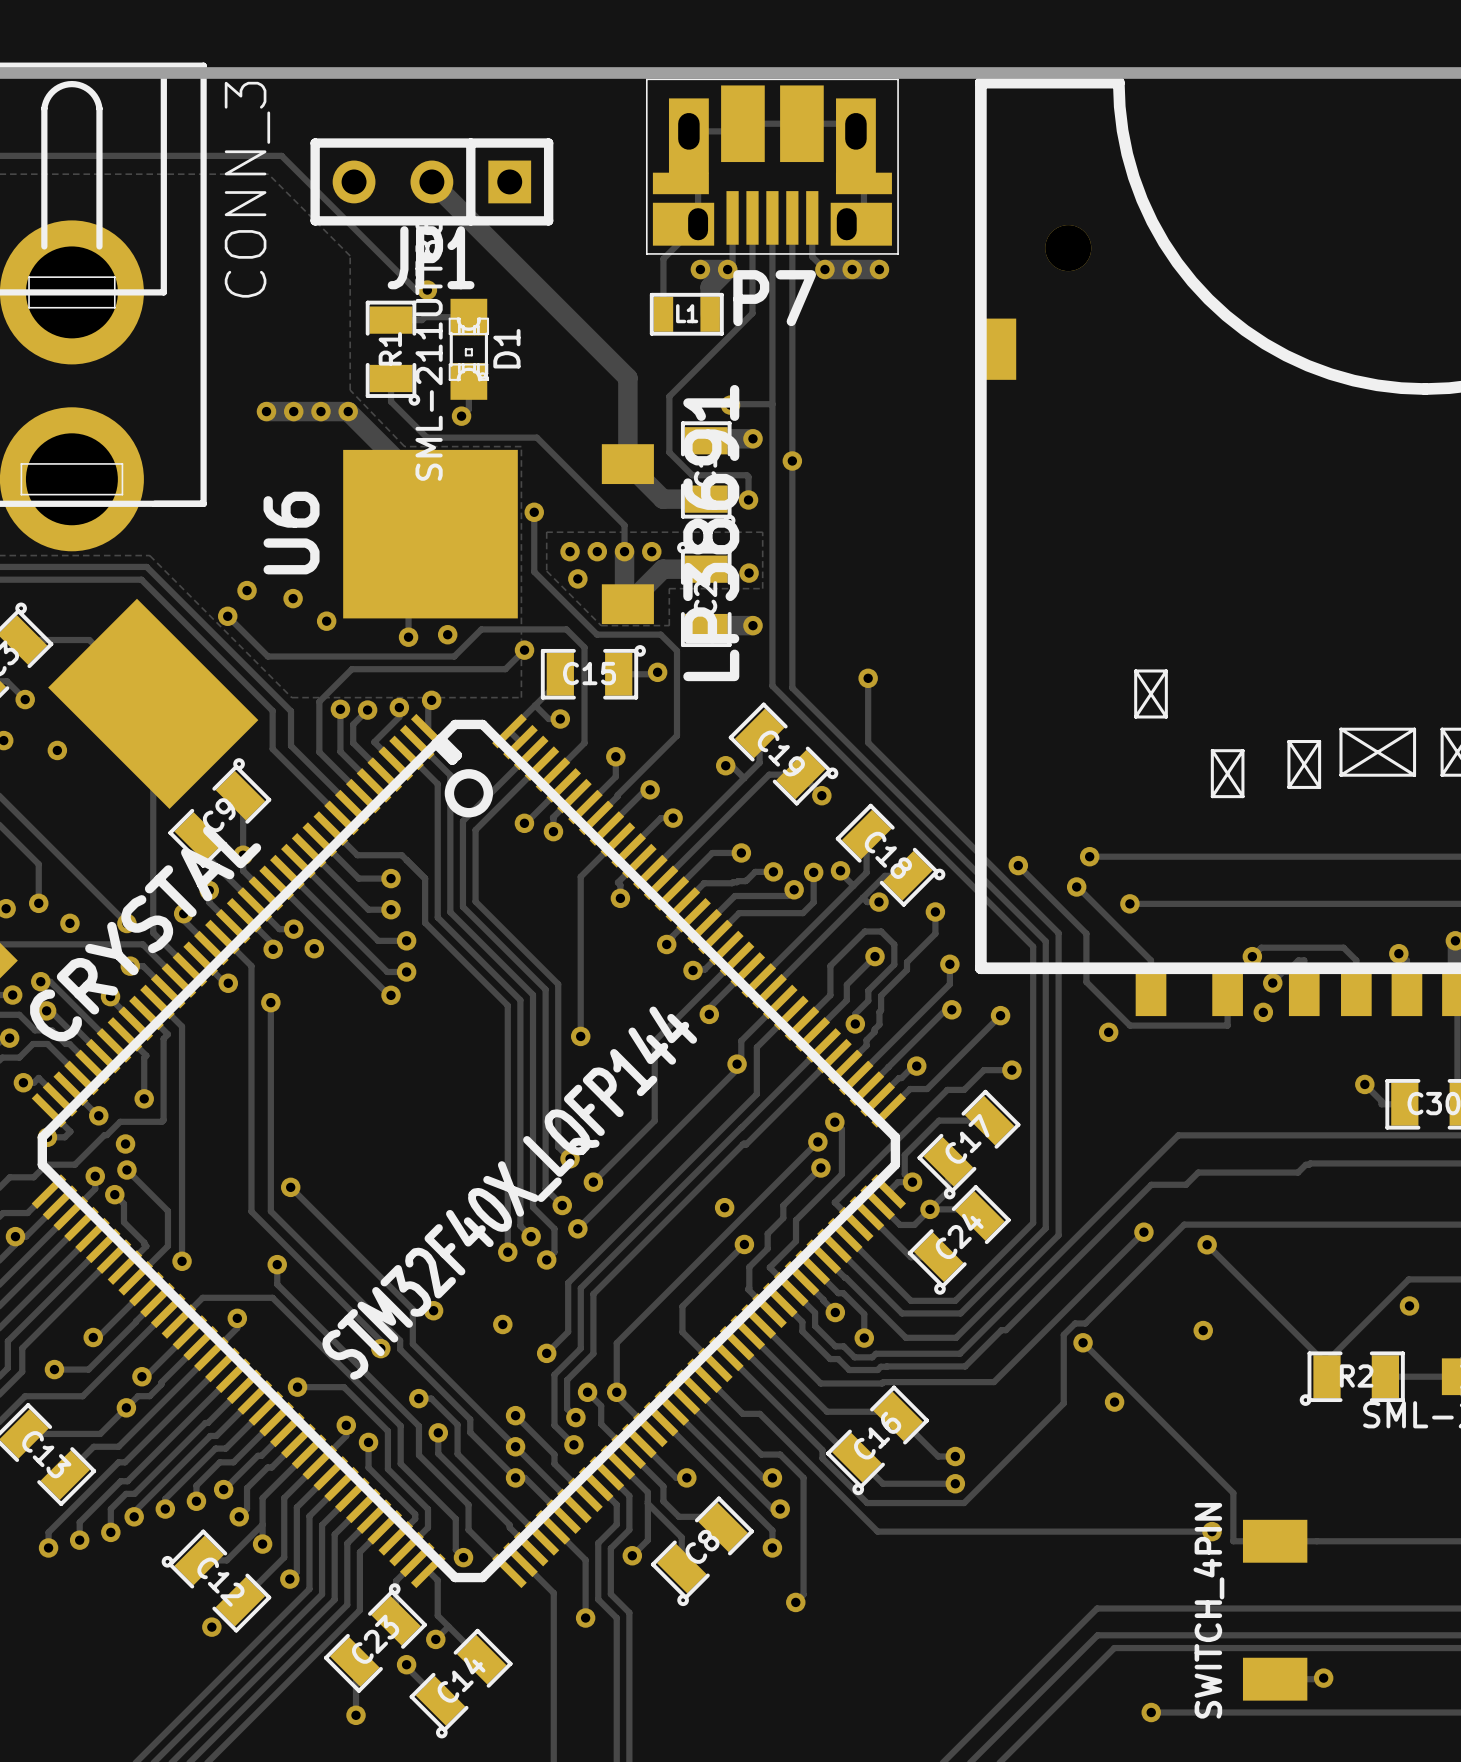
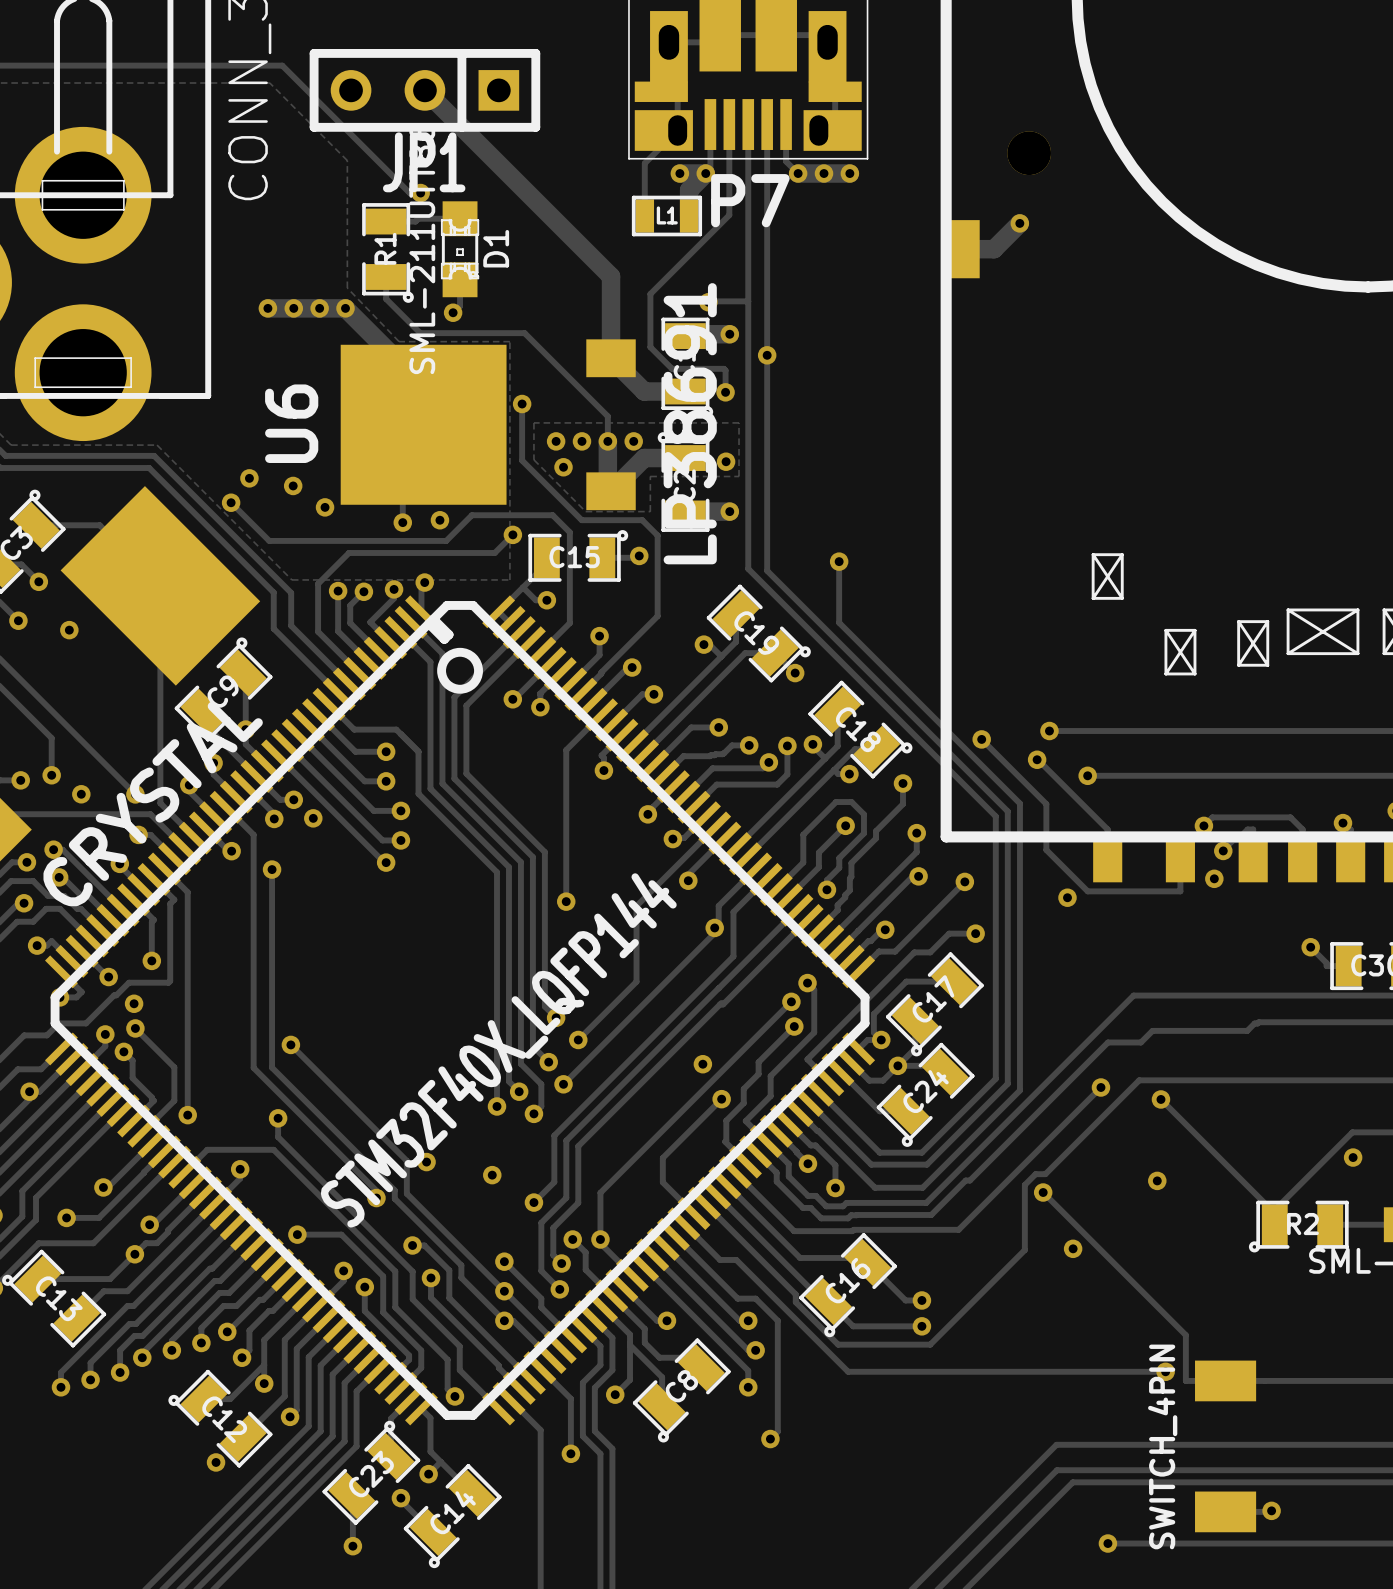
track: none -> (1019, 223) (994, 249) (962, 249)
via: none -> (1019, 223)

